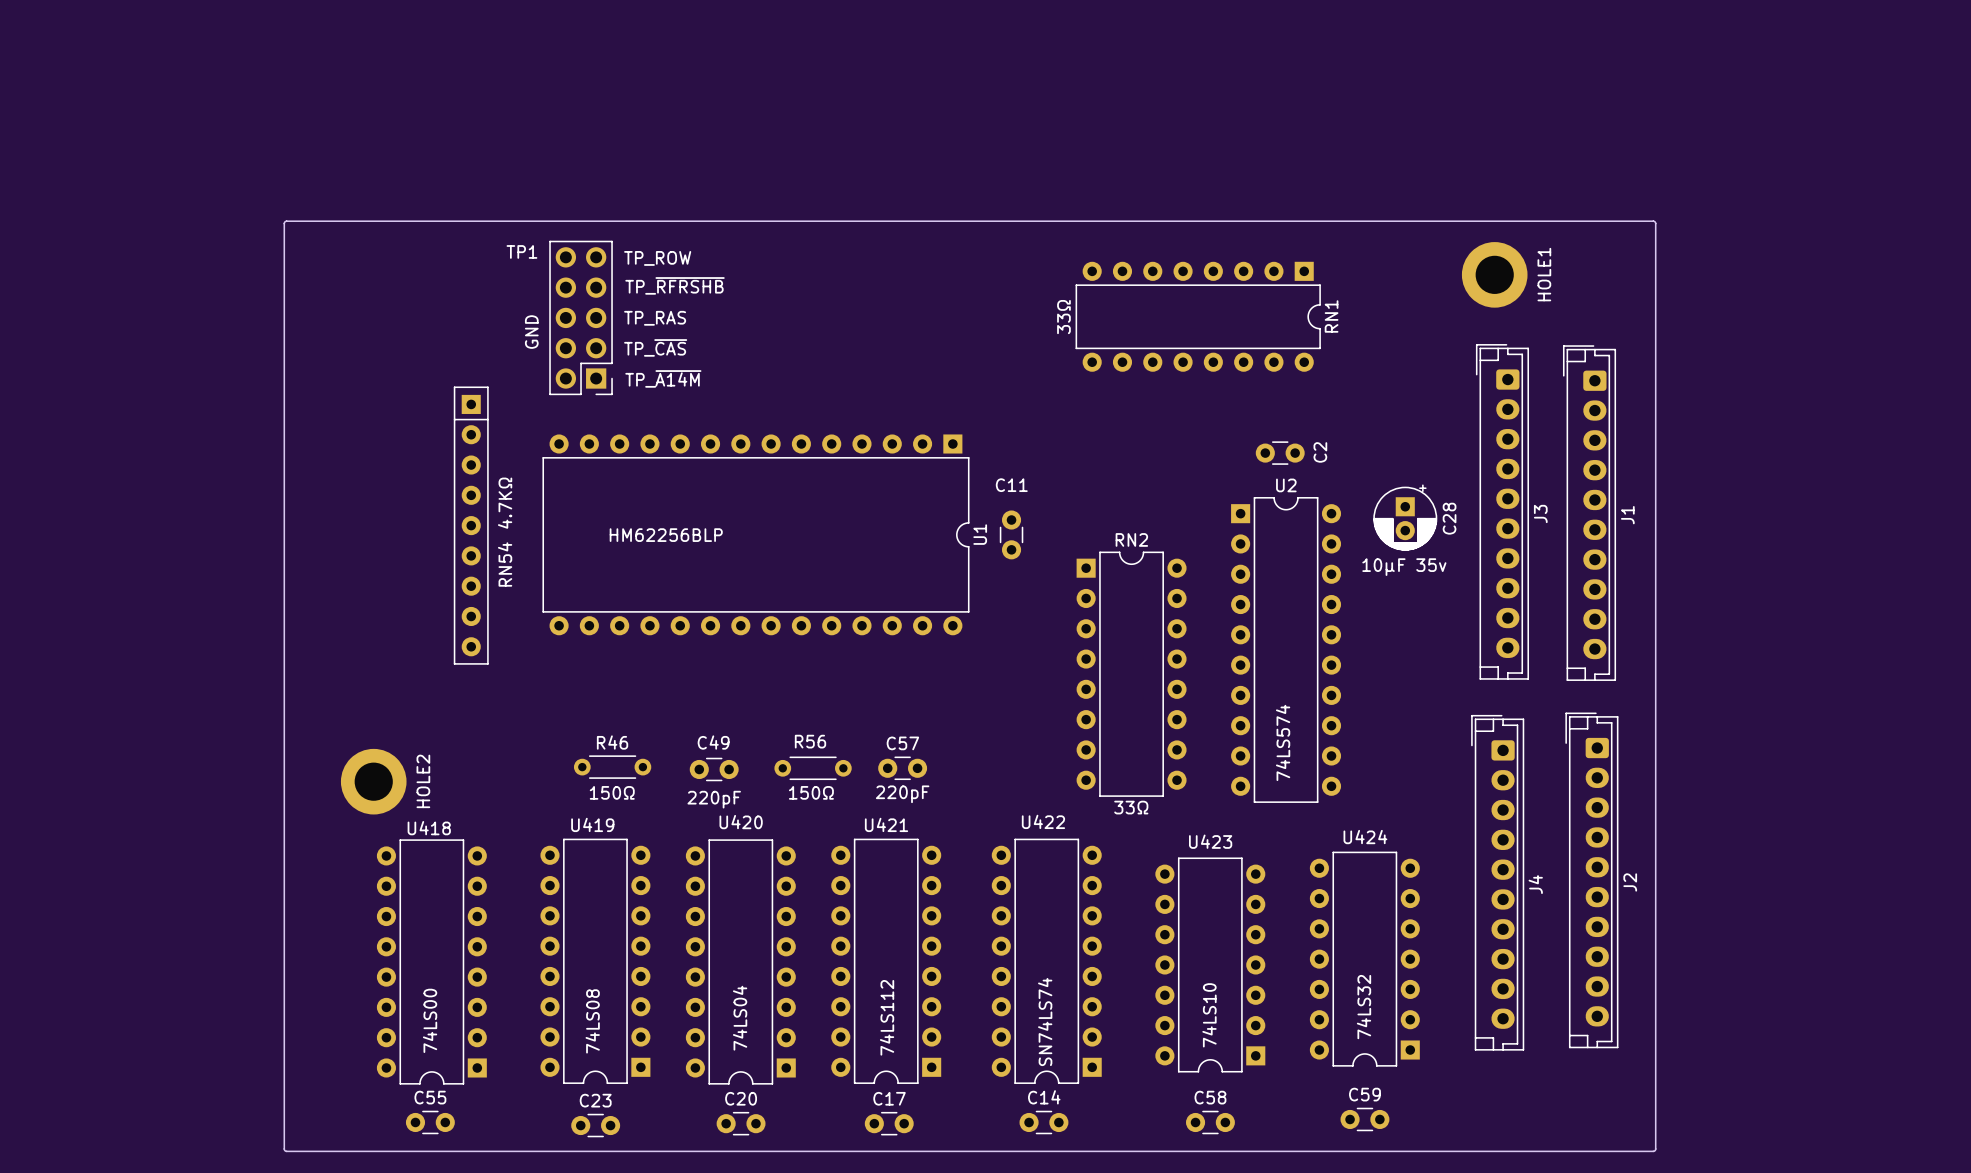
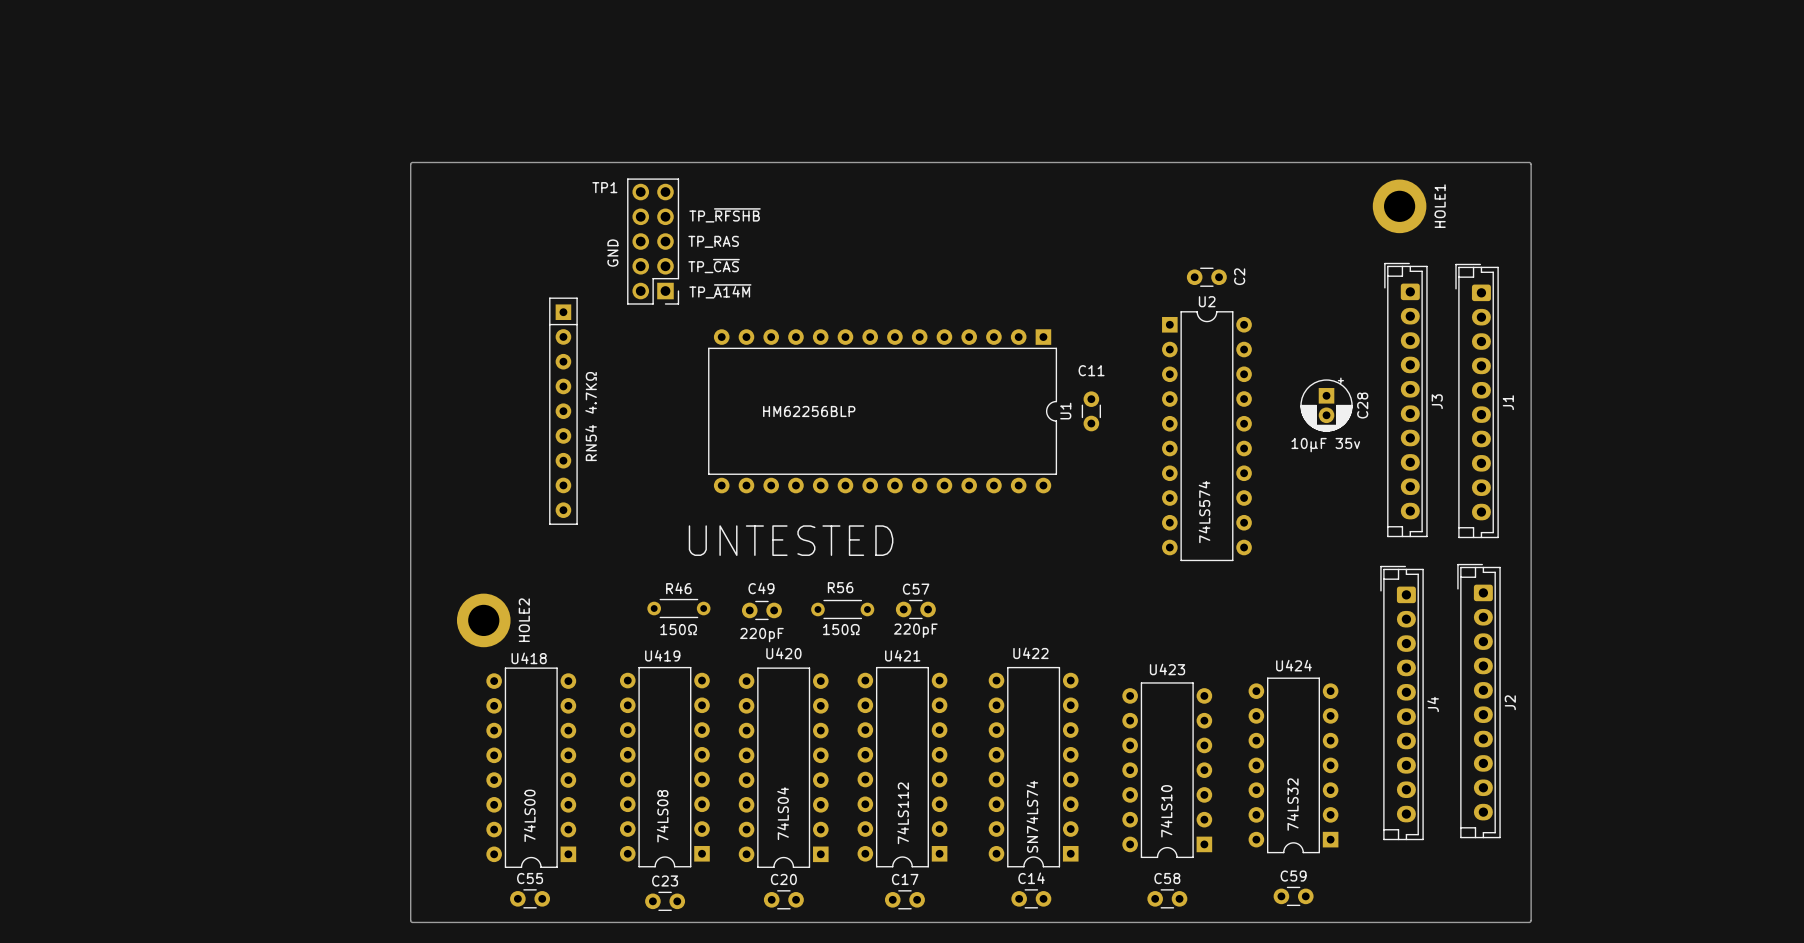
text: TP_ROW (657, 258) -> none
text: TP_~{RFRSHB} (675, 285) -> TP_~{RFSHB} (725, 215)
RN1: 33Ω (1198, 316) -> none
C2 position: (1280, 453) -> (1206, 277)
U1 position: (755, 534) -> (882, 411)
C11 position: (1011, 534) -> (1091, 411)
U2 position: (1286, 649) -> (1206, 436)
RN2: 33Ω (1131, 674) -> none
text: none -> UNTESTED (791, 540)

